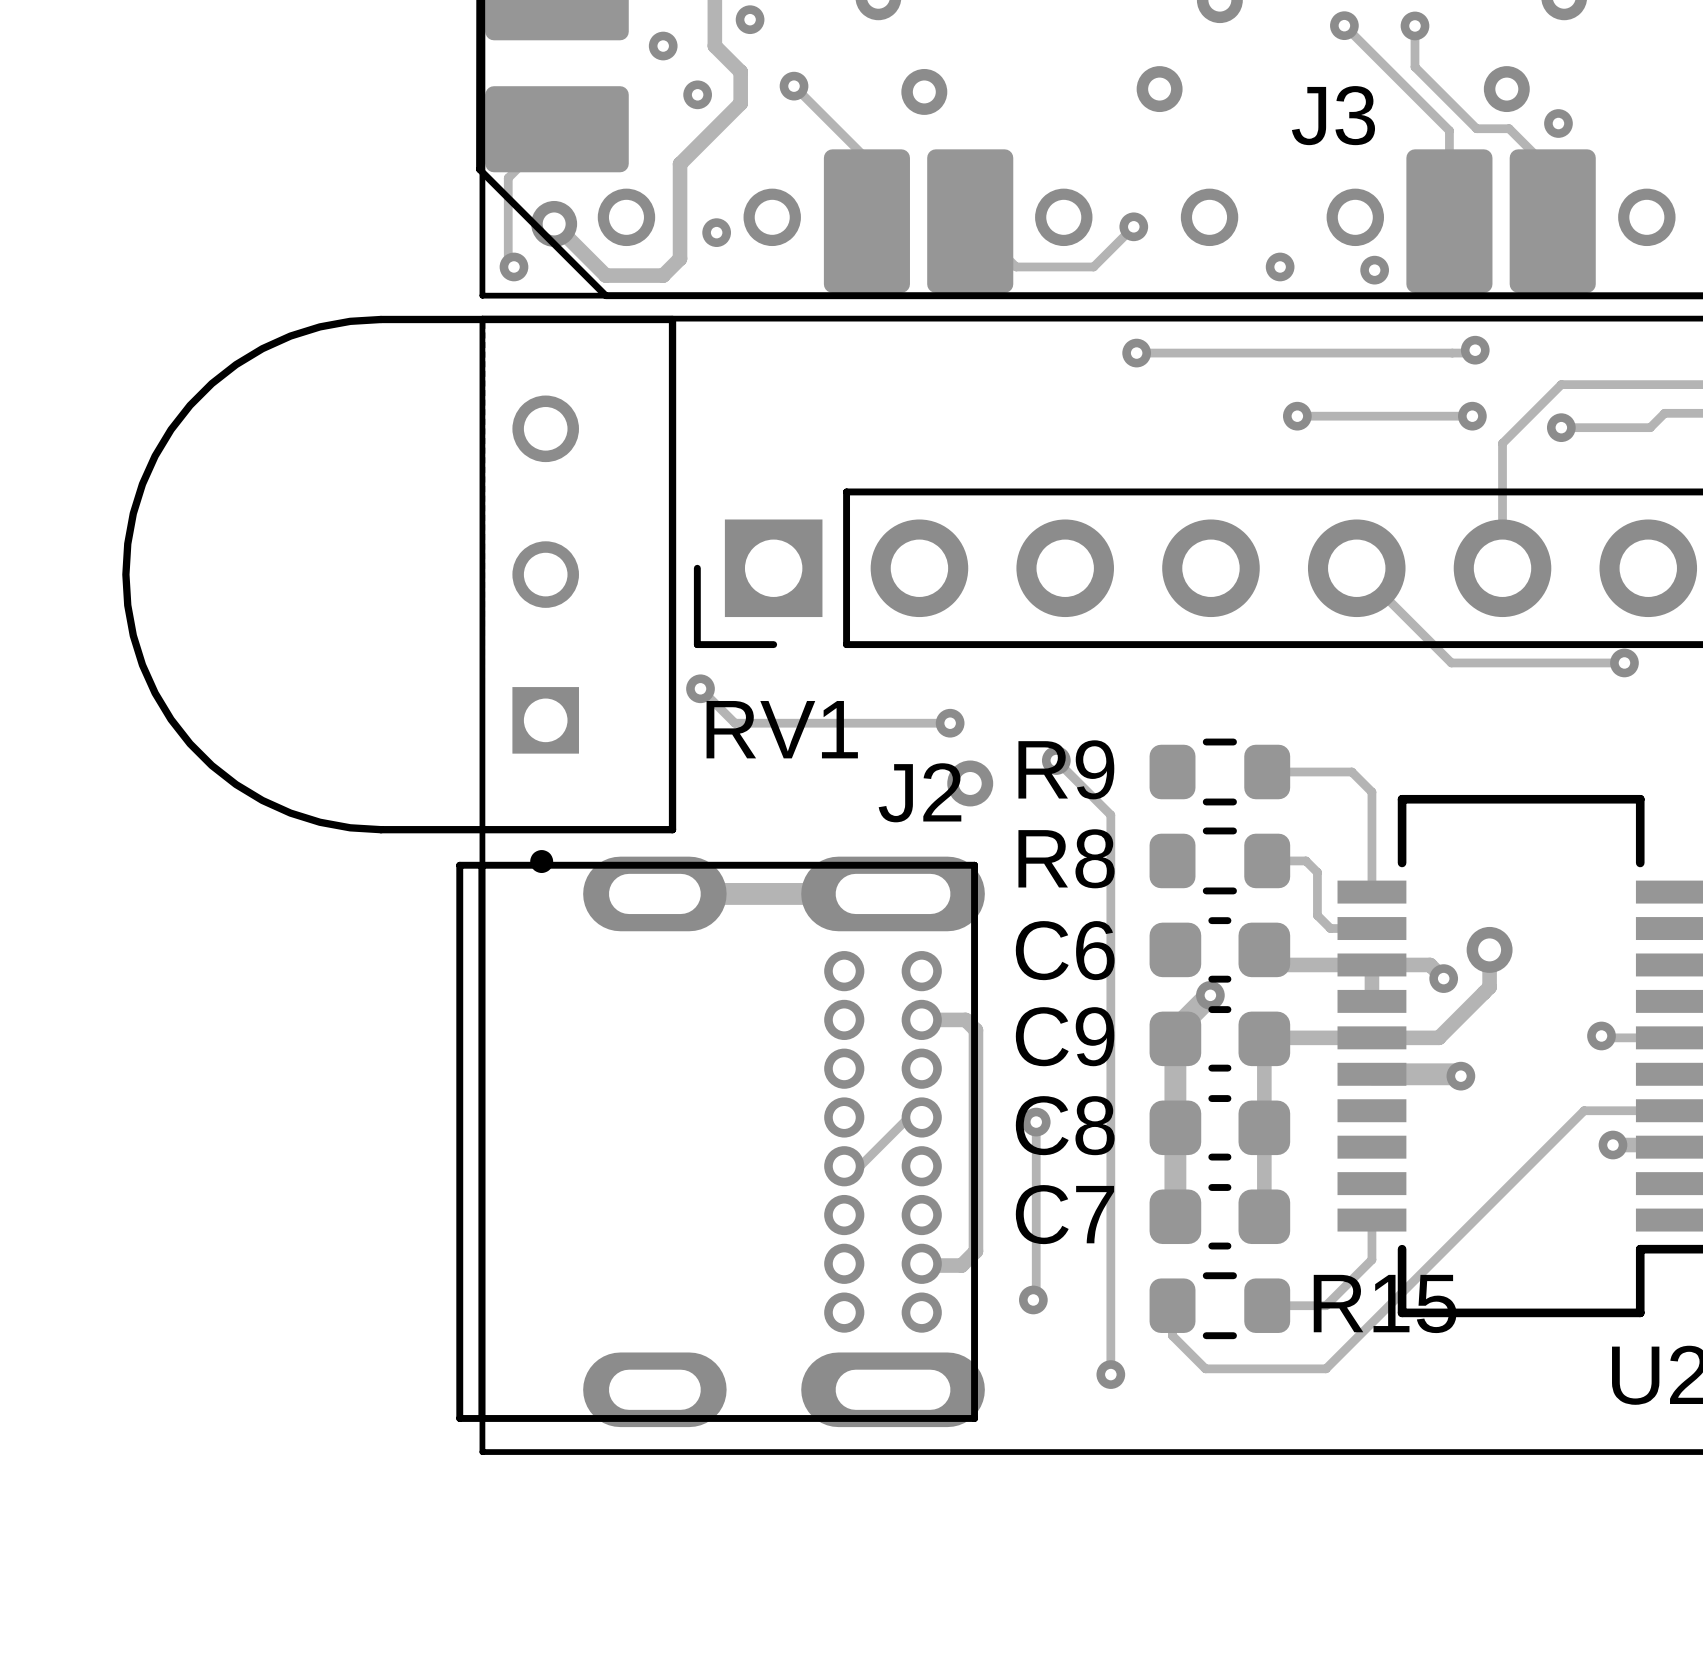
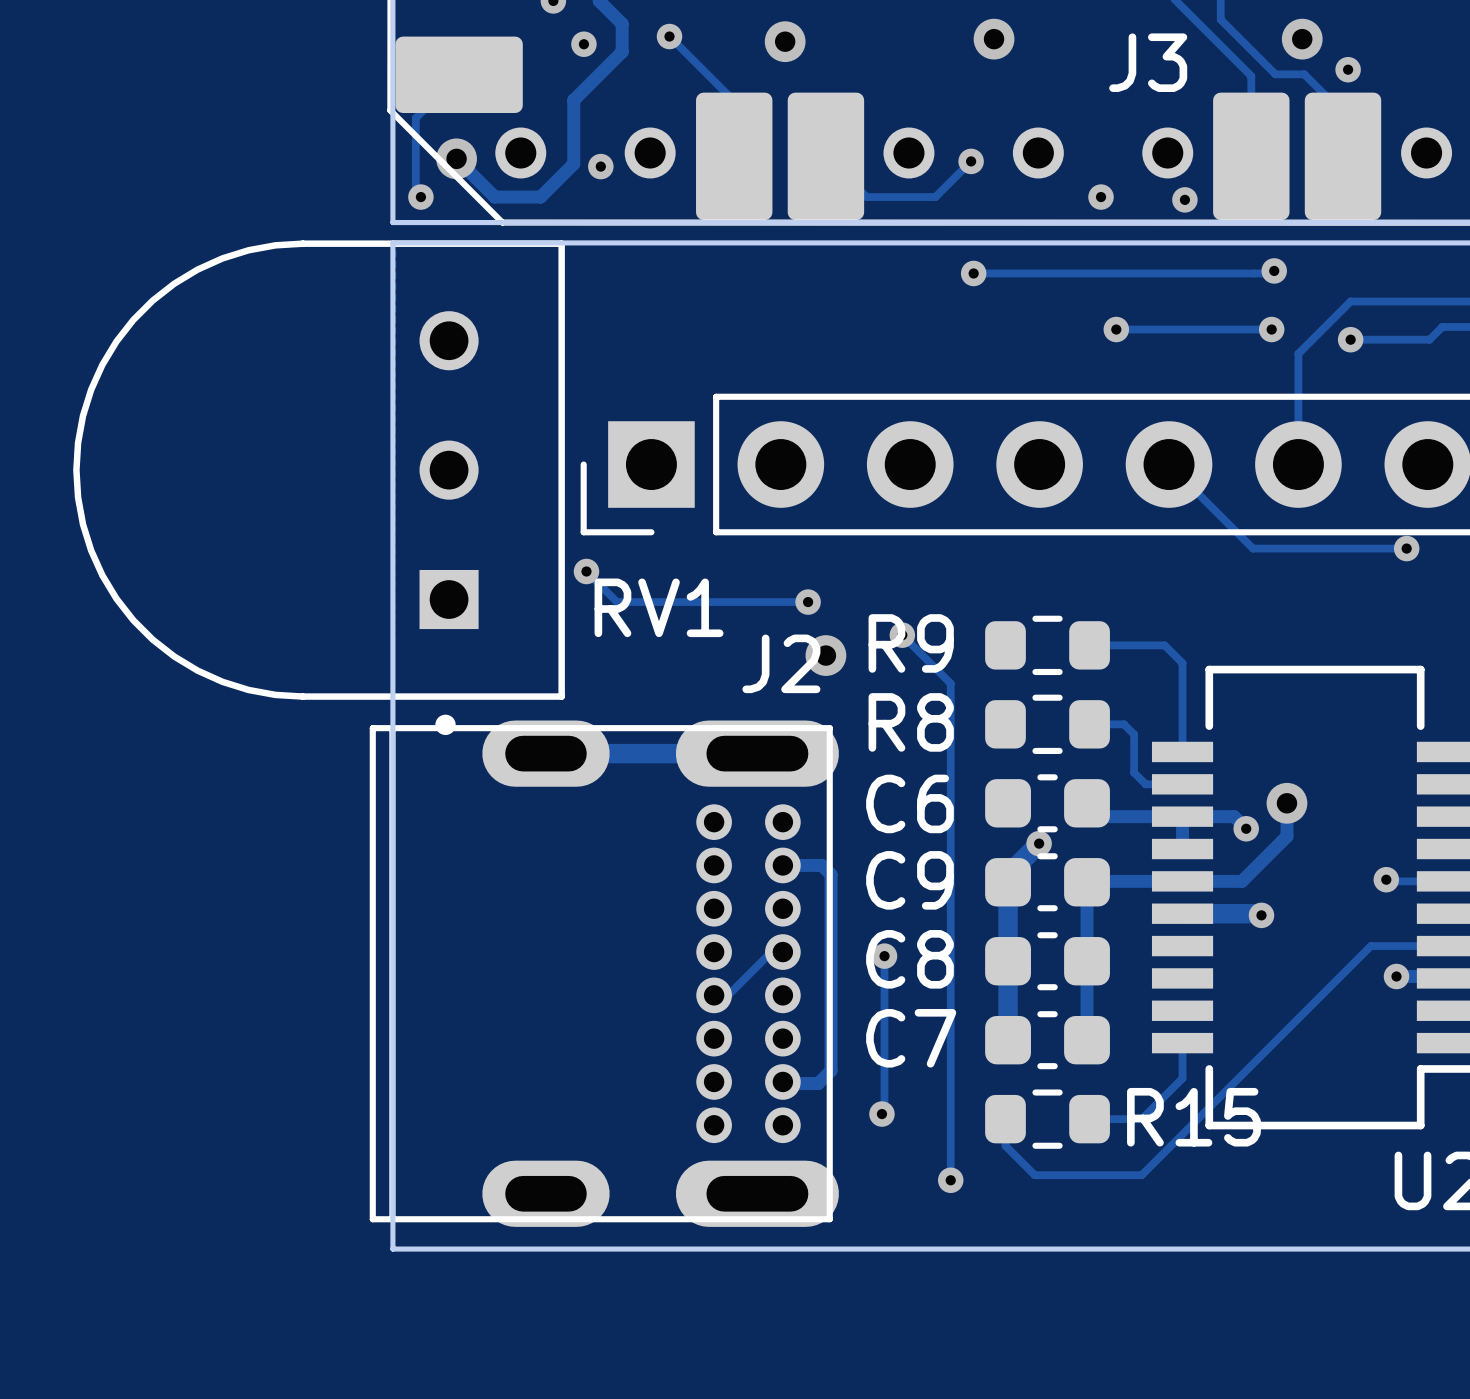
track: (686, 157) (680, 164) (680, 258) (663, 275) (605, 275) (597, 266) -> (573, 100) (573, 163) (540, 197) (494, 197)

